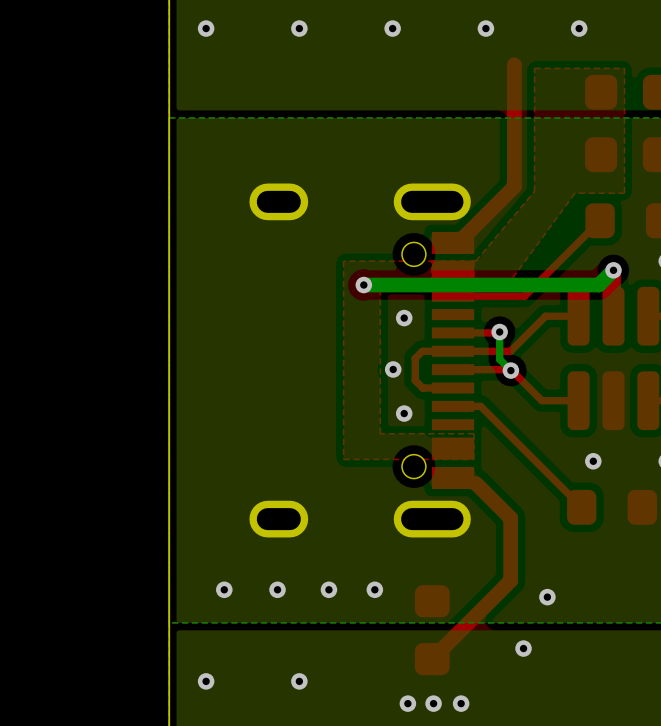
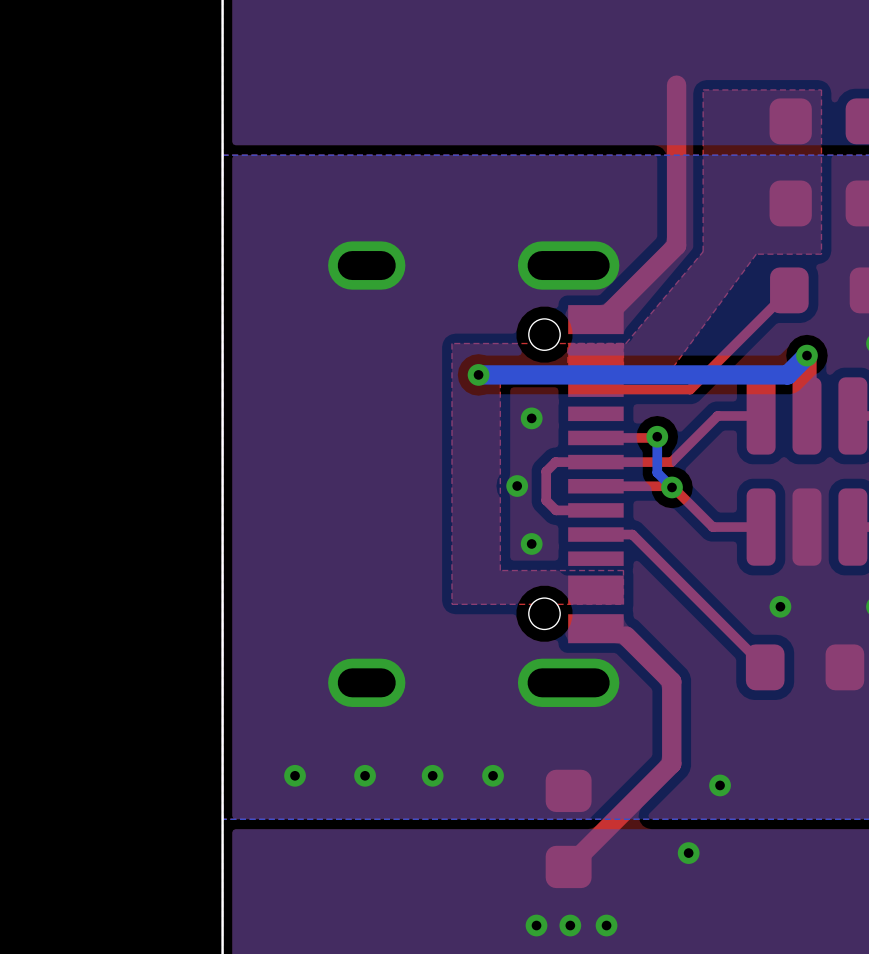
via: (206, 28) -> none
via: (299, 28) -> none
via: (392, 28) -> none
via: (485, 28) -> none
via: (579, 28) -> none
via: (206, 681) -> none
via: (299, 681) -> none

